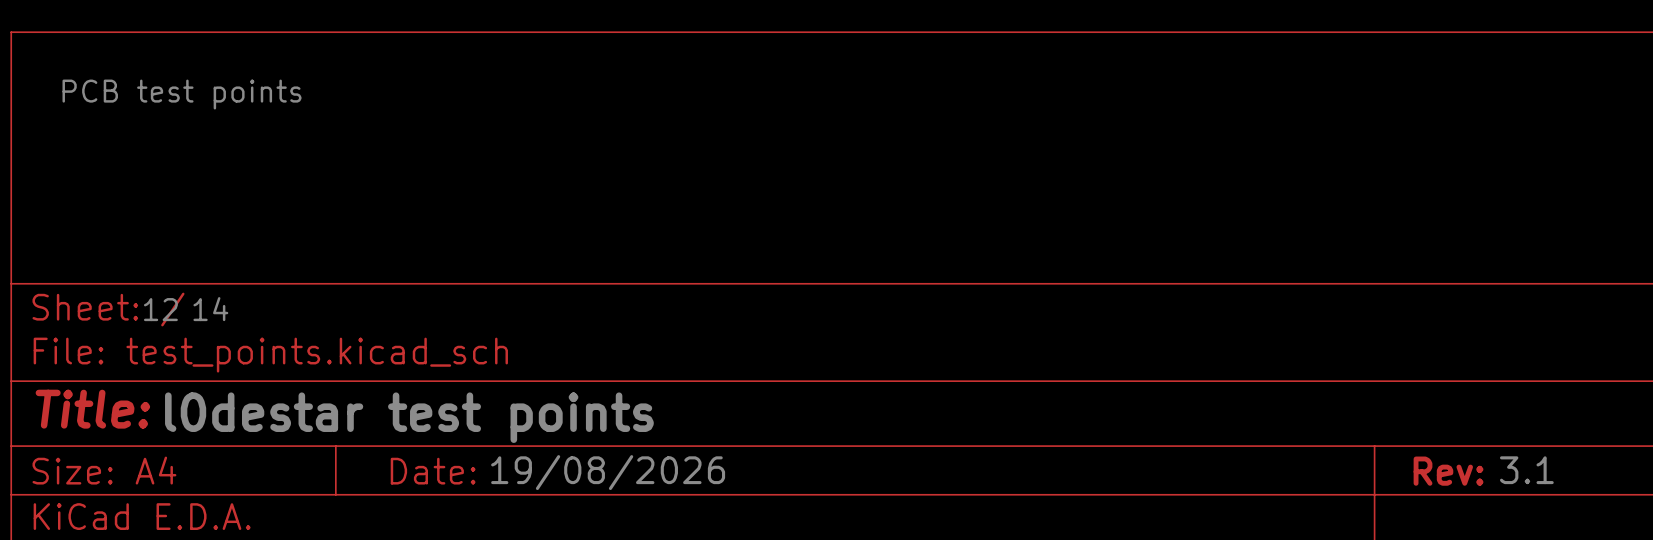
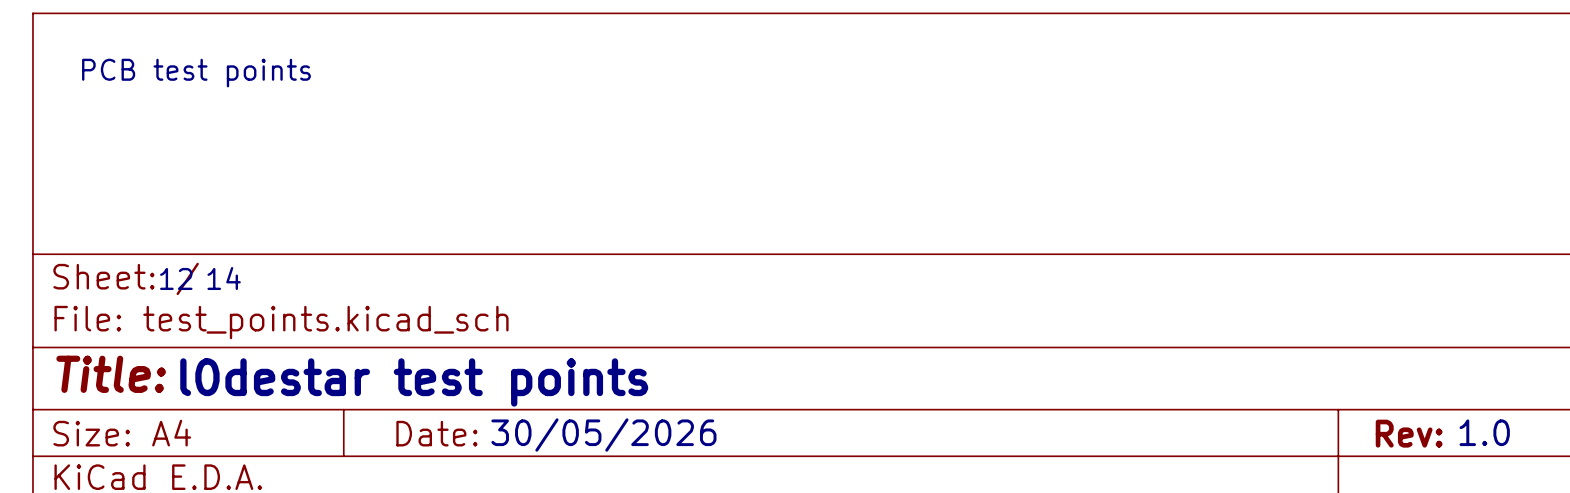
text: 3.1 (1526, 470) -> 1.0 (1484, 432)
text: 19/08/2026 (608, 472) -> 30/05/2026 (603, 435)

